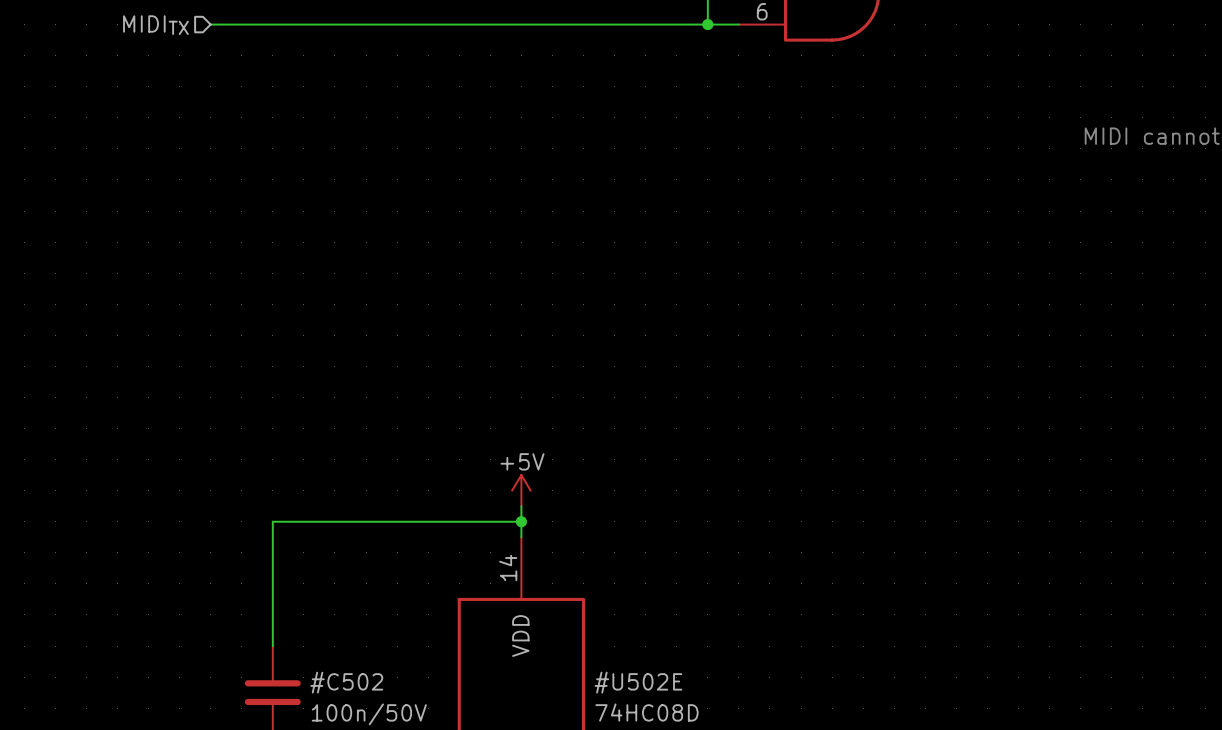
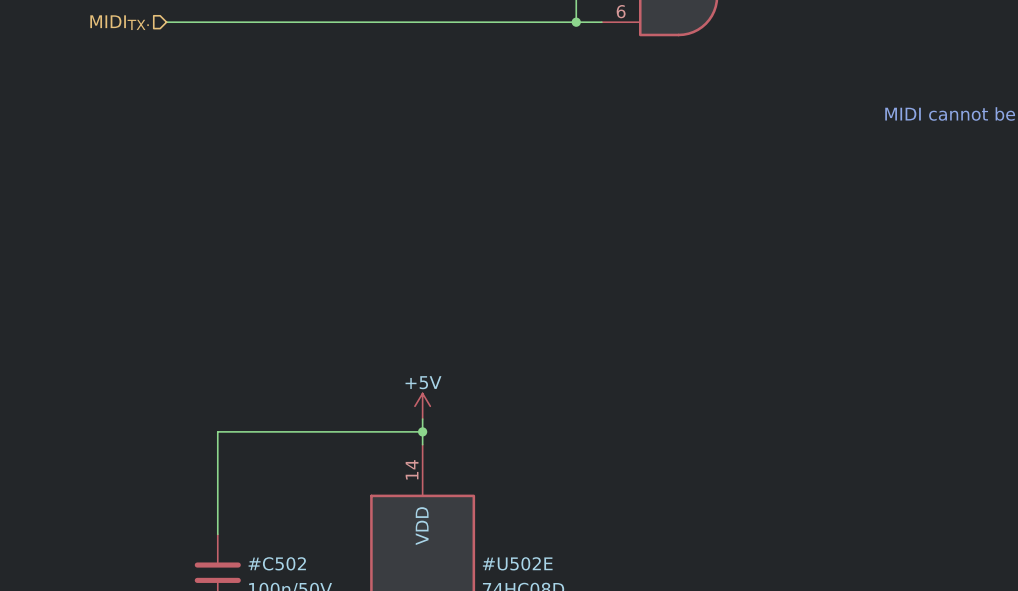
hierarchical label: MIDITX (155, 25) -> MIDITX· (119, 22)

